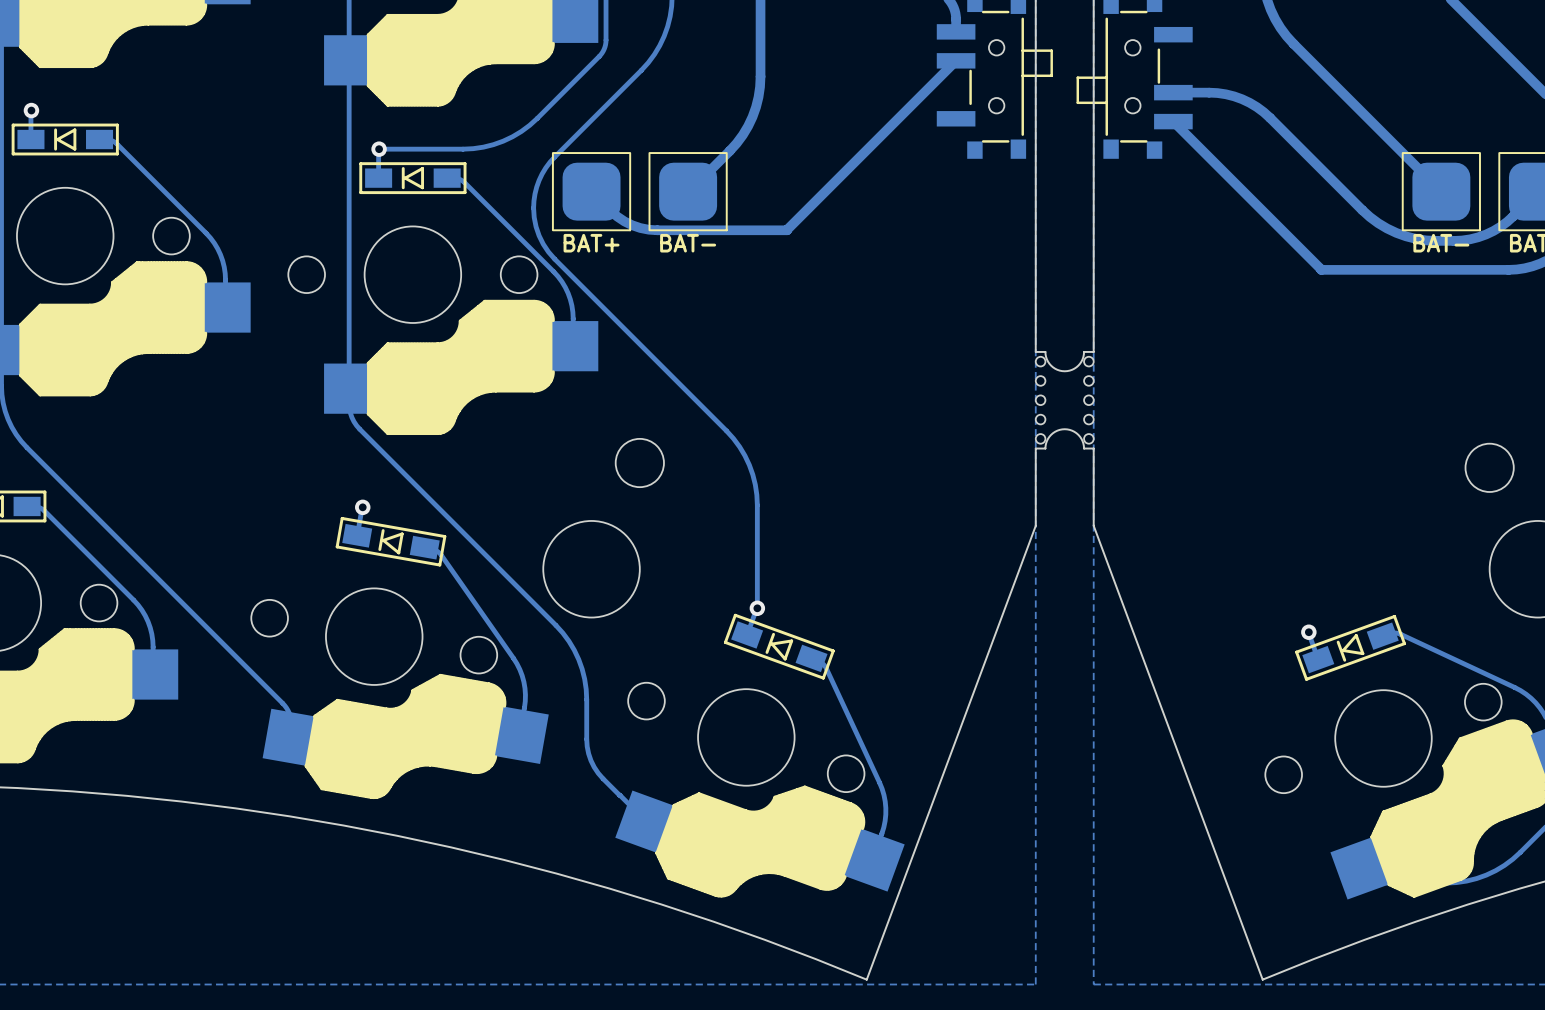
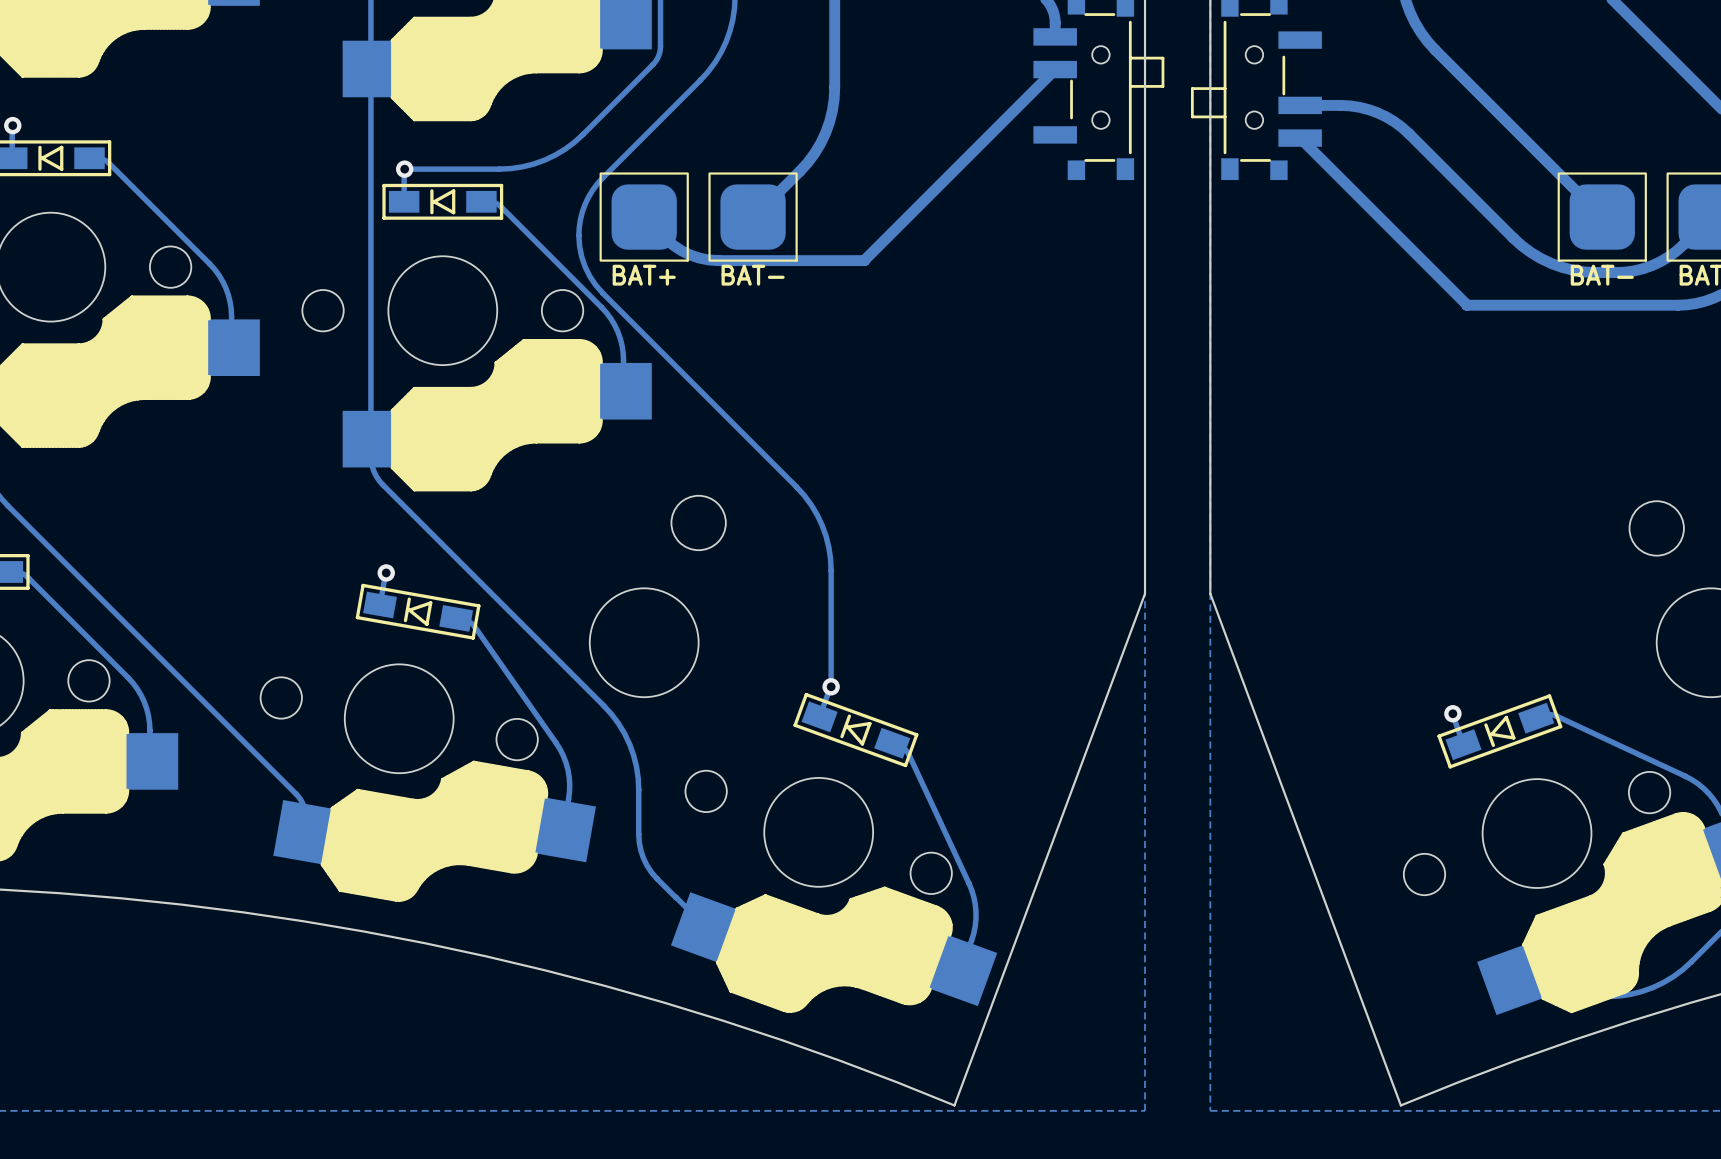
board edge: none -> (1145, 397) (1145, 506)
board edge: none -> (1210, 397) (1210, 506)
part: (1064, 400) -> none

